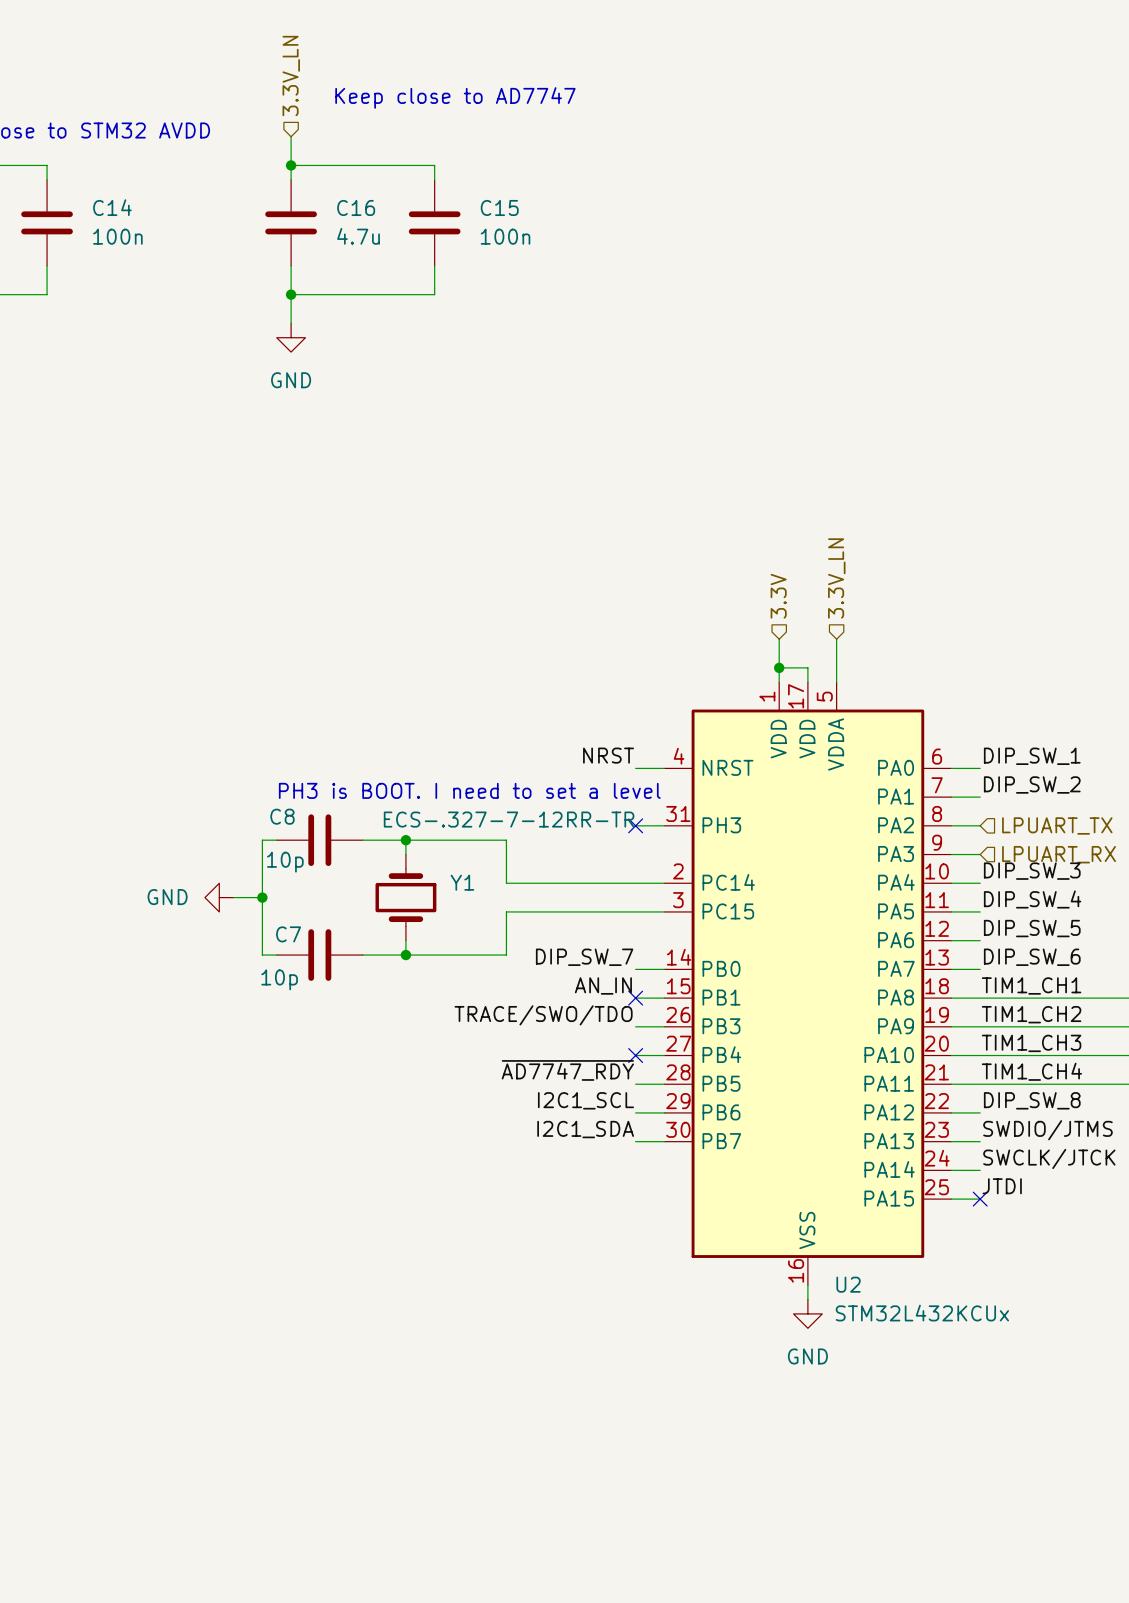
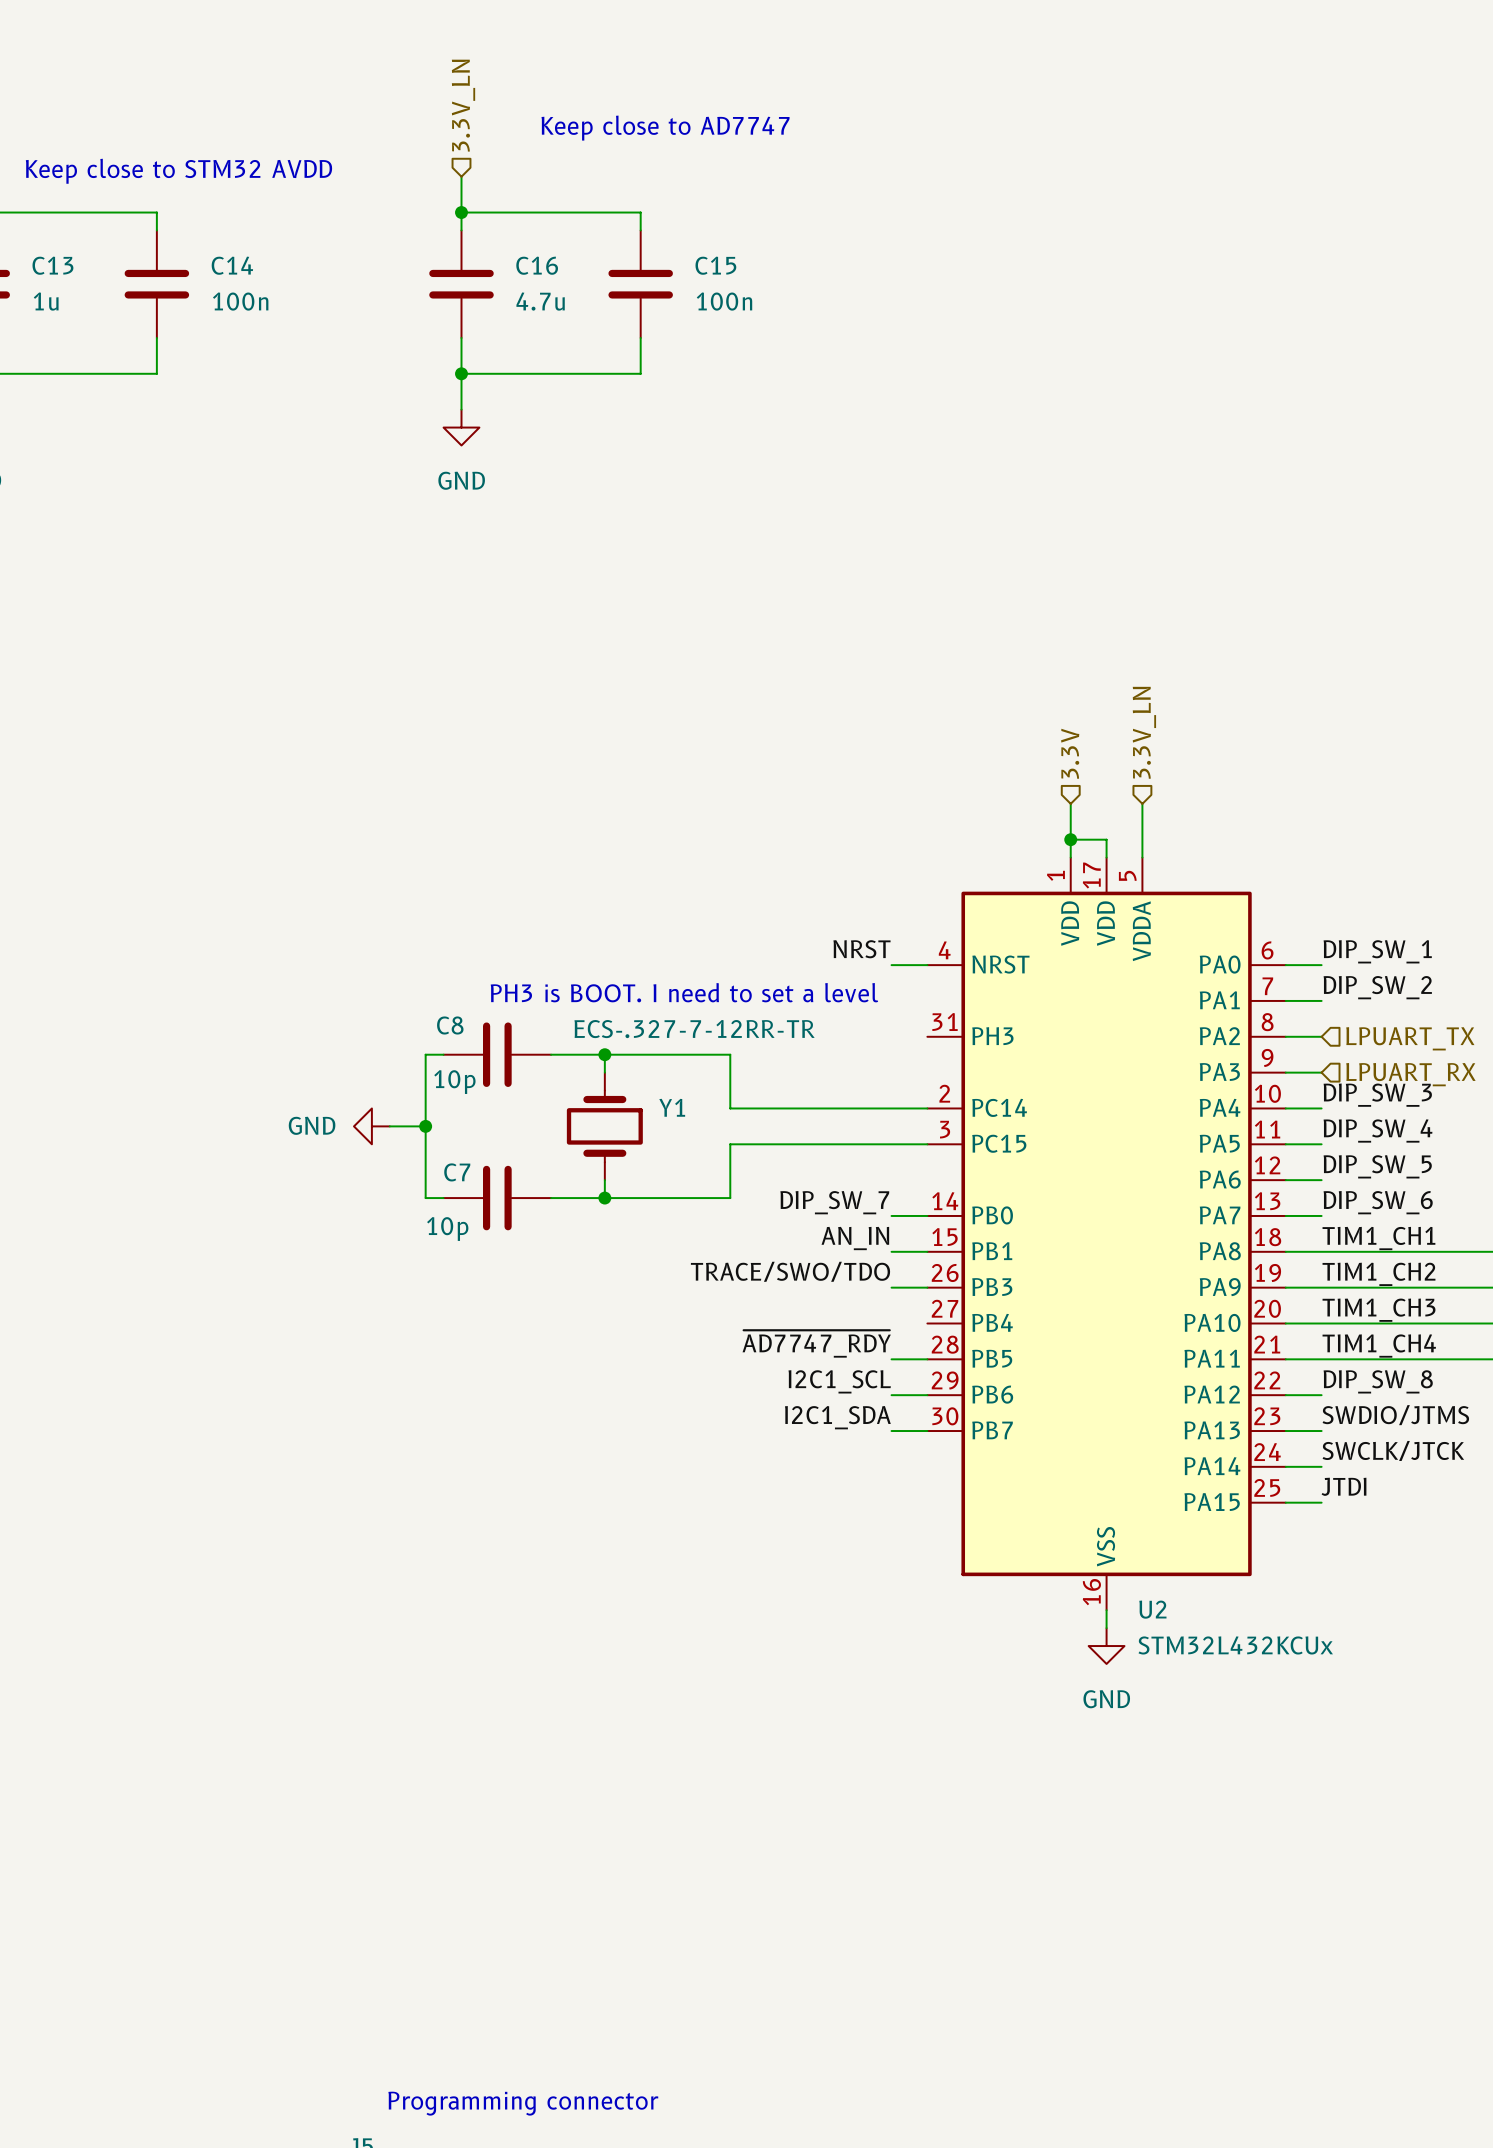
wire: (635, 825) (664, 825) -> none
no-connect mark: (635, 825) -> none
no-connect mark: (635, 998) -> none
wire: (635, 1055) (664, 1055) -> none
no-connect mark: (635, 1055) -> none
no-connect mark: (980, 1199) -> none

